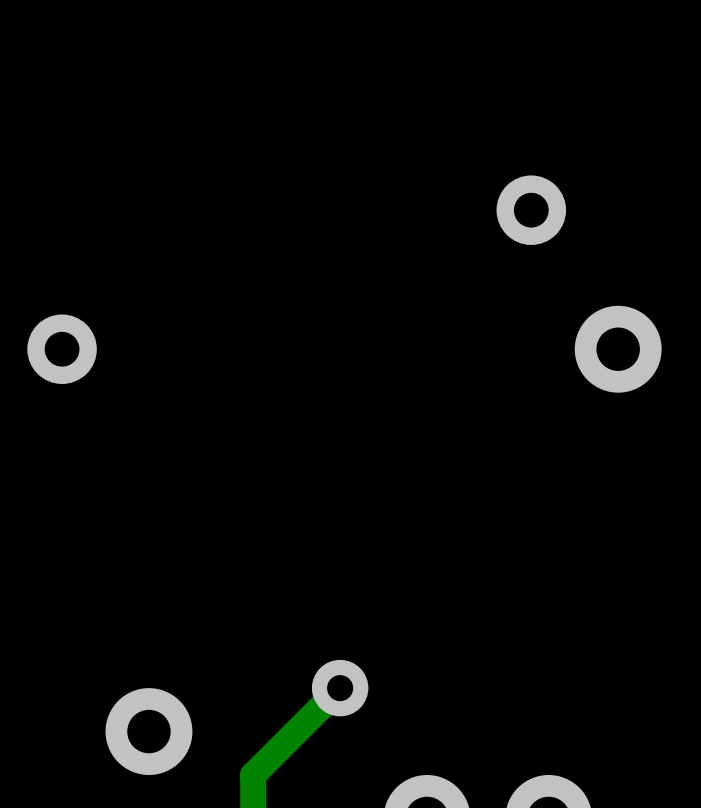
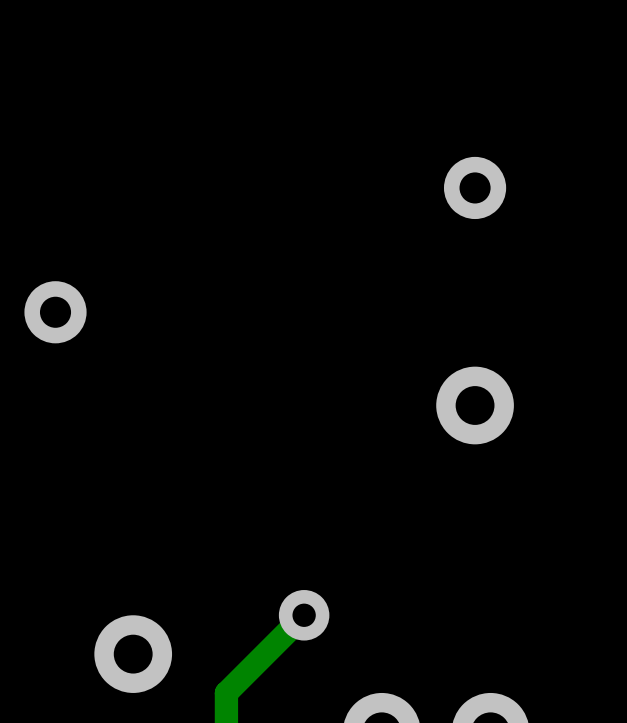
via position: (618, 349) -> (475, 405)

